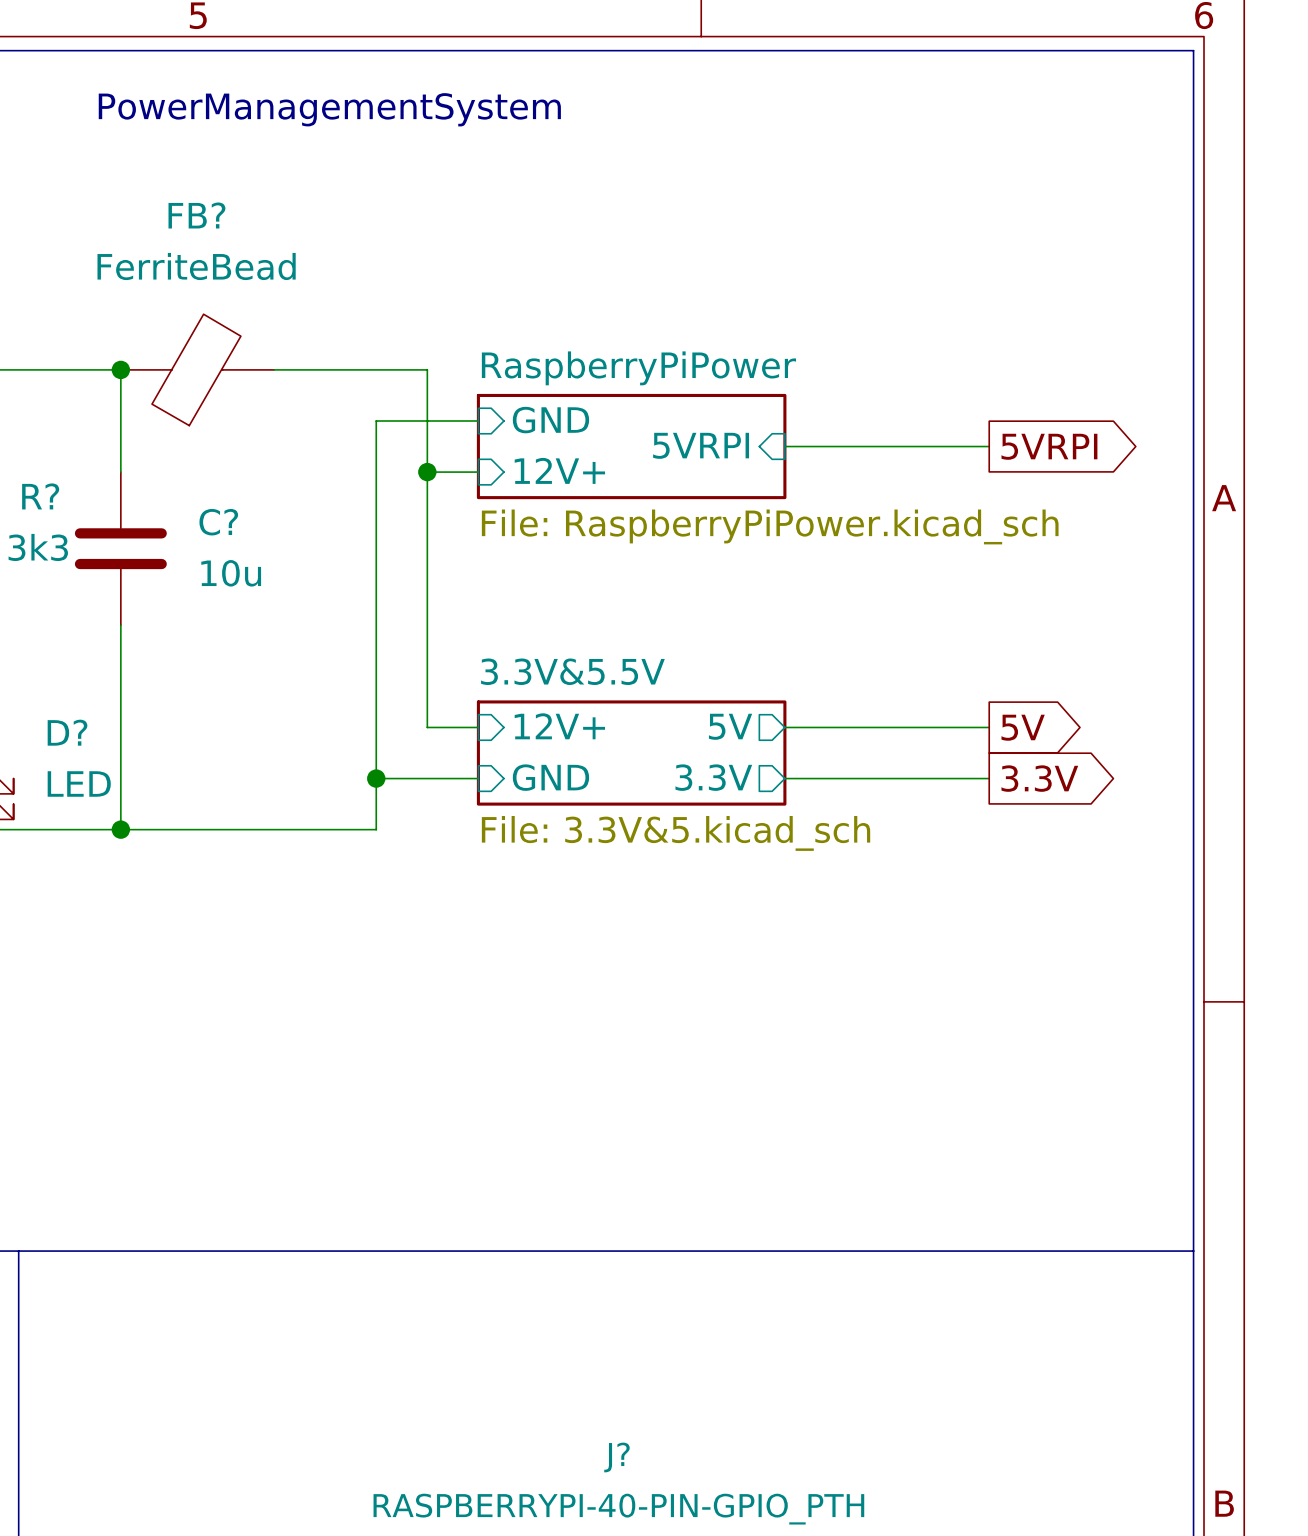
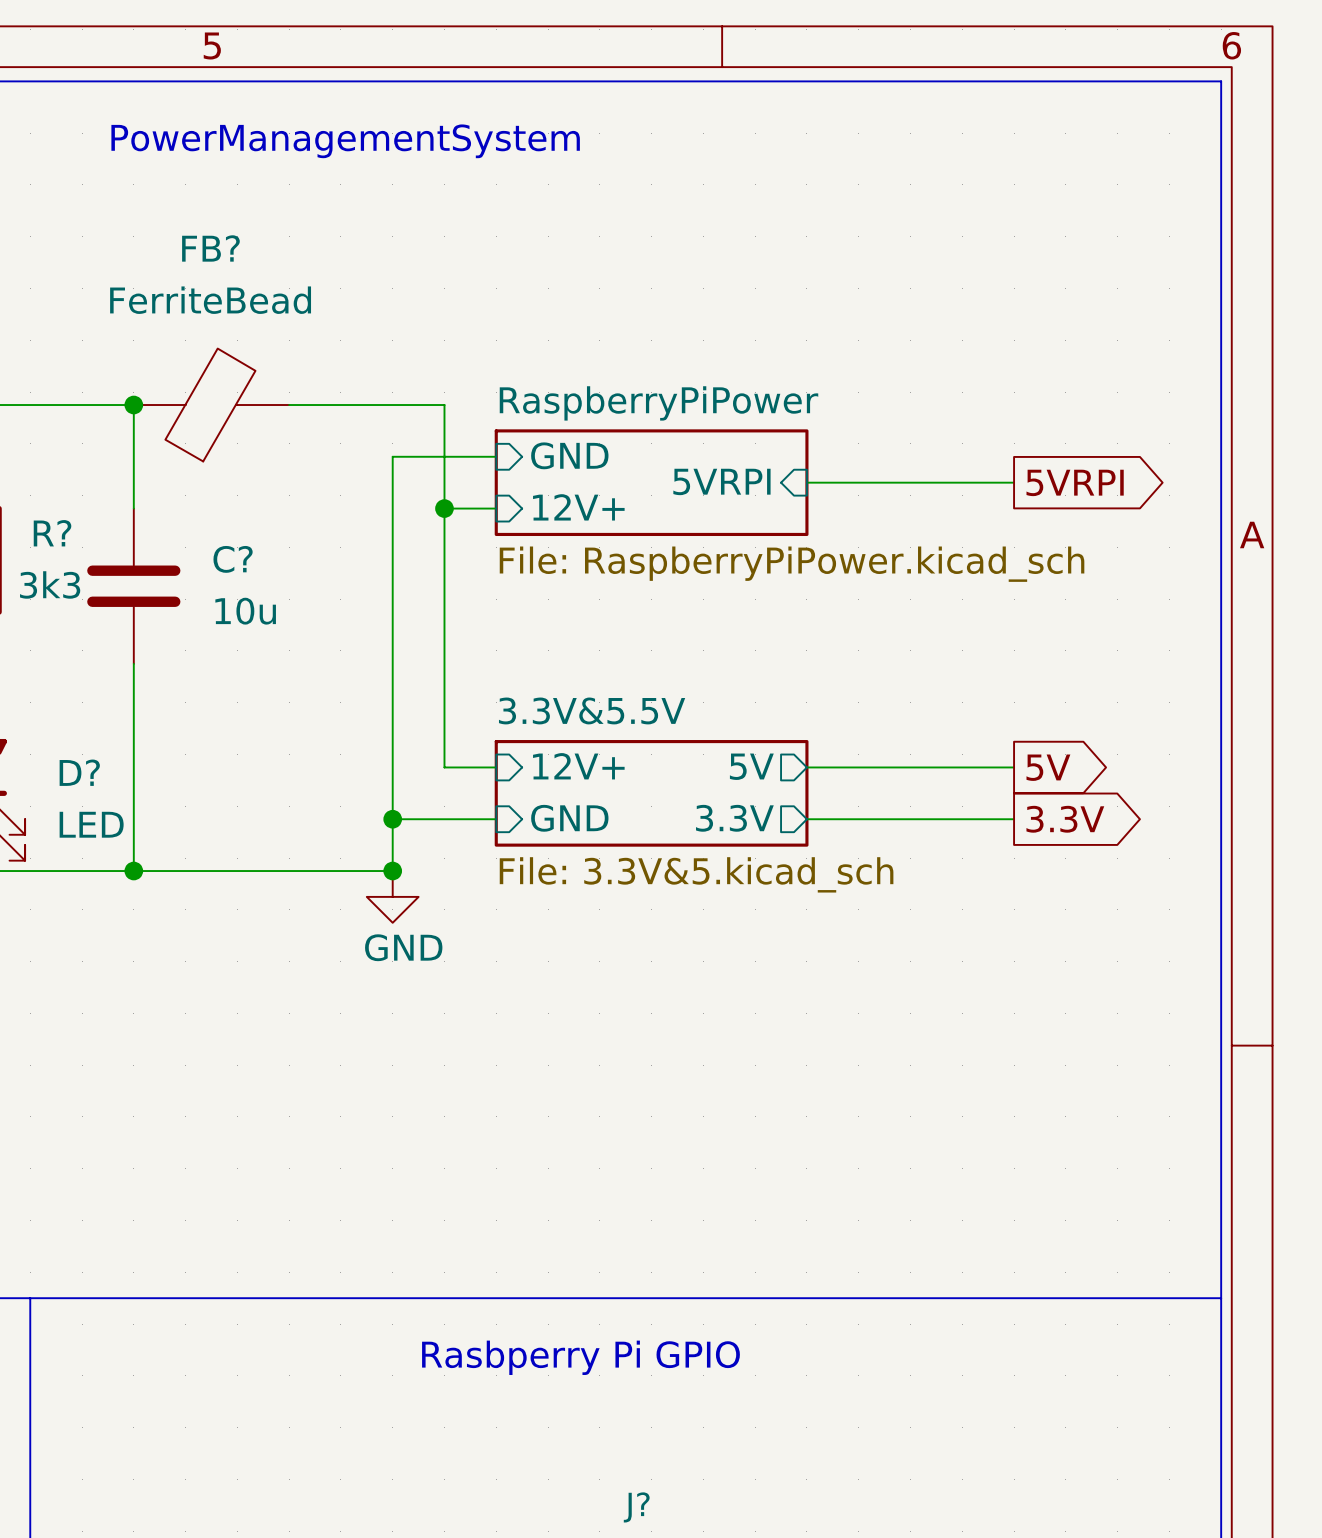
junction: none -> (392, 871)
power symbol: none -> GND (392, 896)
text: none -> Rasbperry Pi GPIO (580, 1357)

